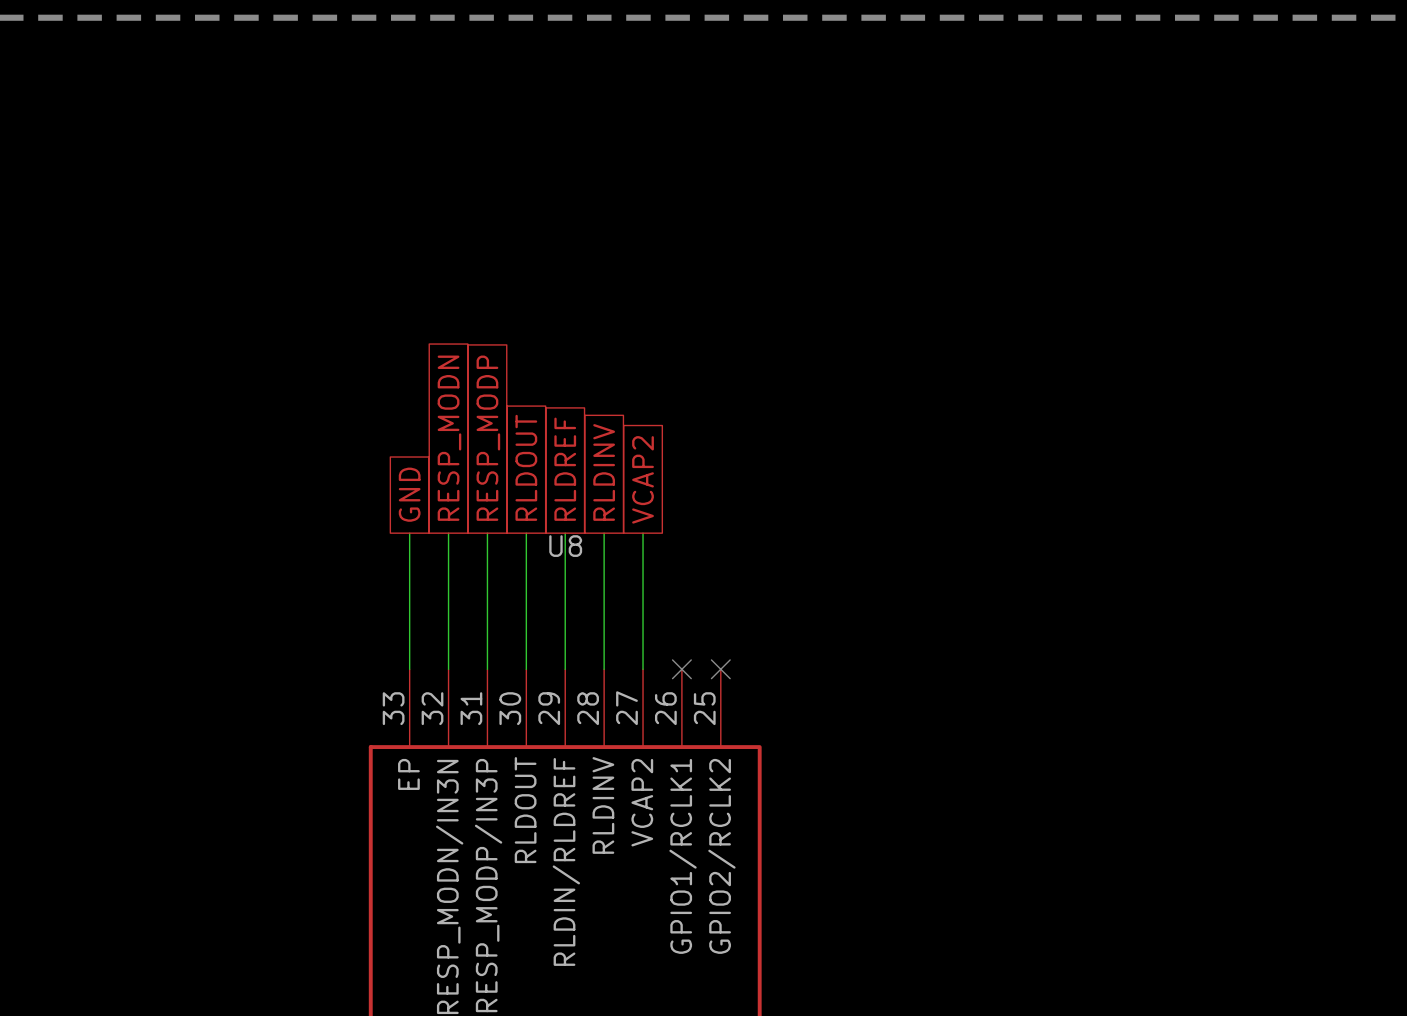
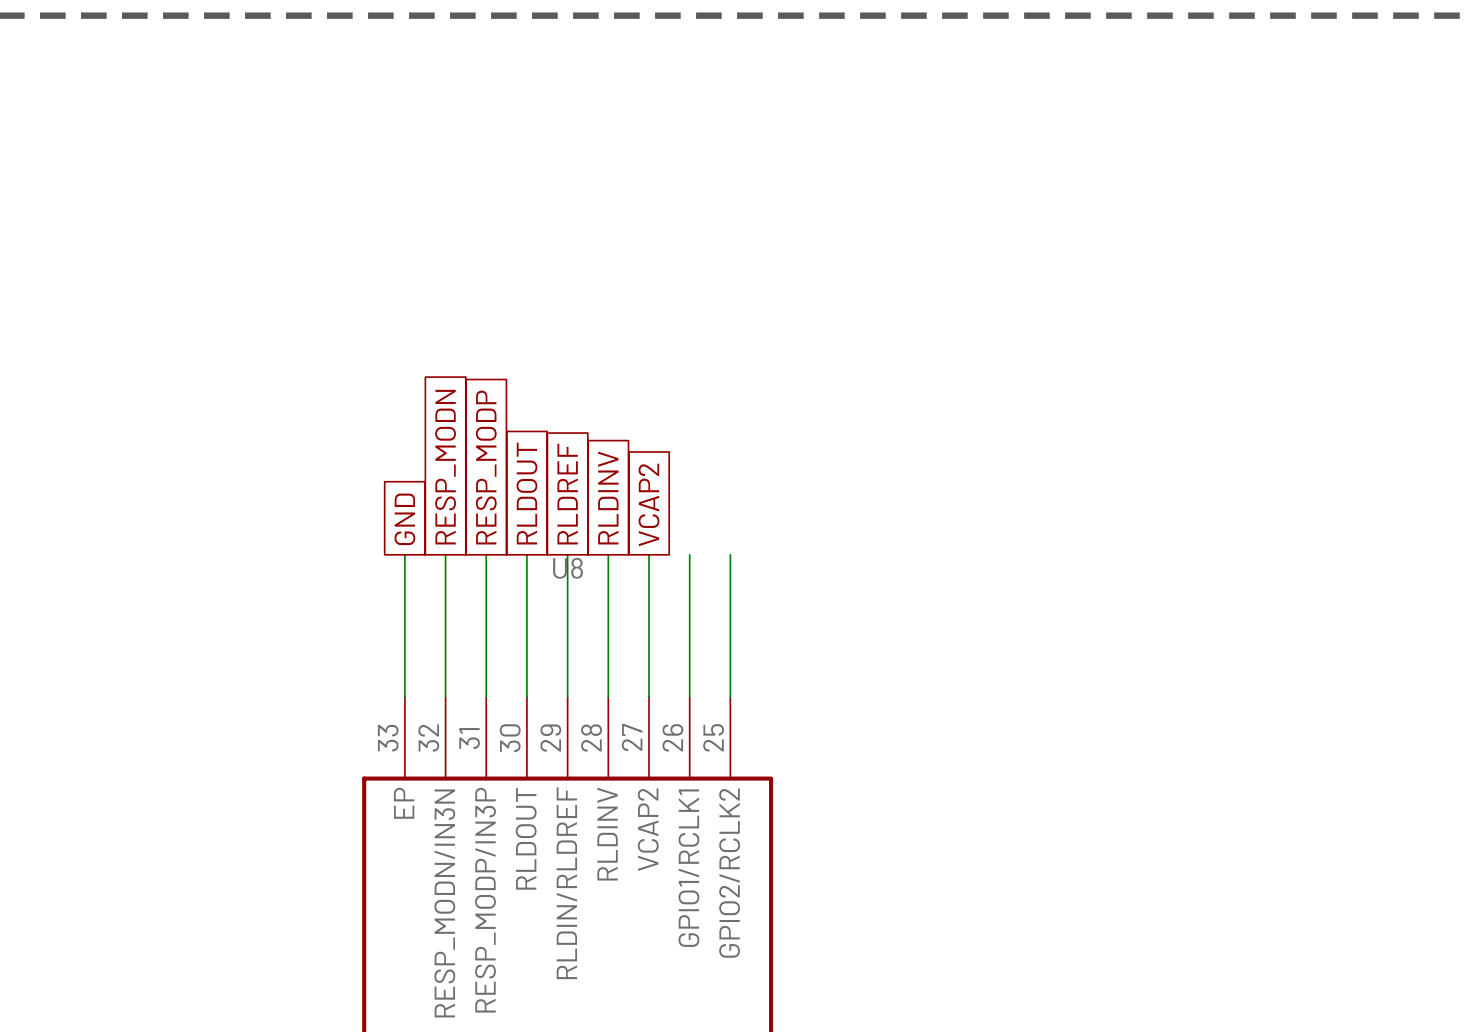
wire: none -> (689, 554) (689, 697)
wire: none -> (730, 554) (730, 697)
no-connect mark: (681, 669) -> none
no-connect mark: (720, 669) -> none

